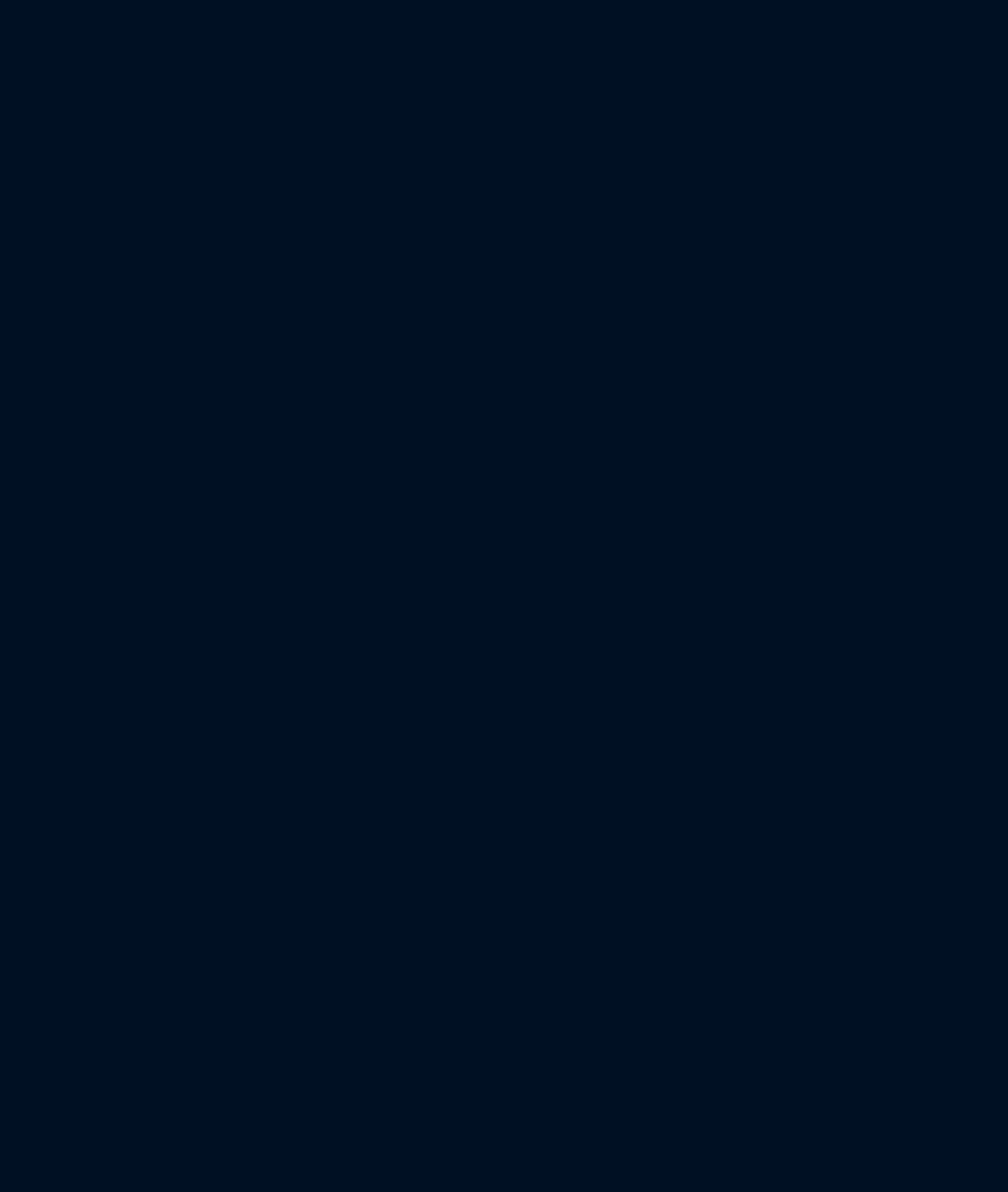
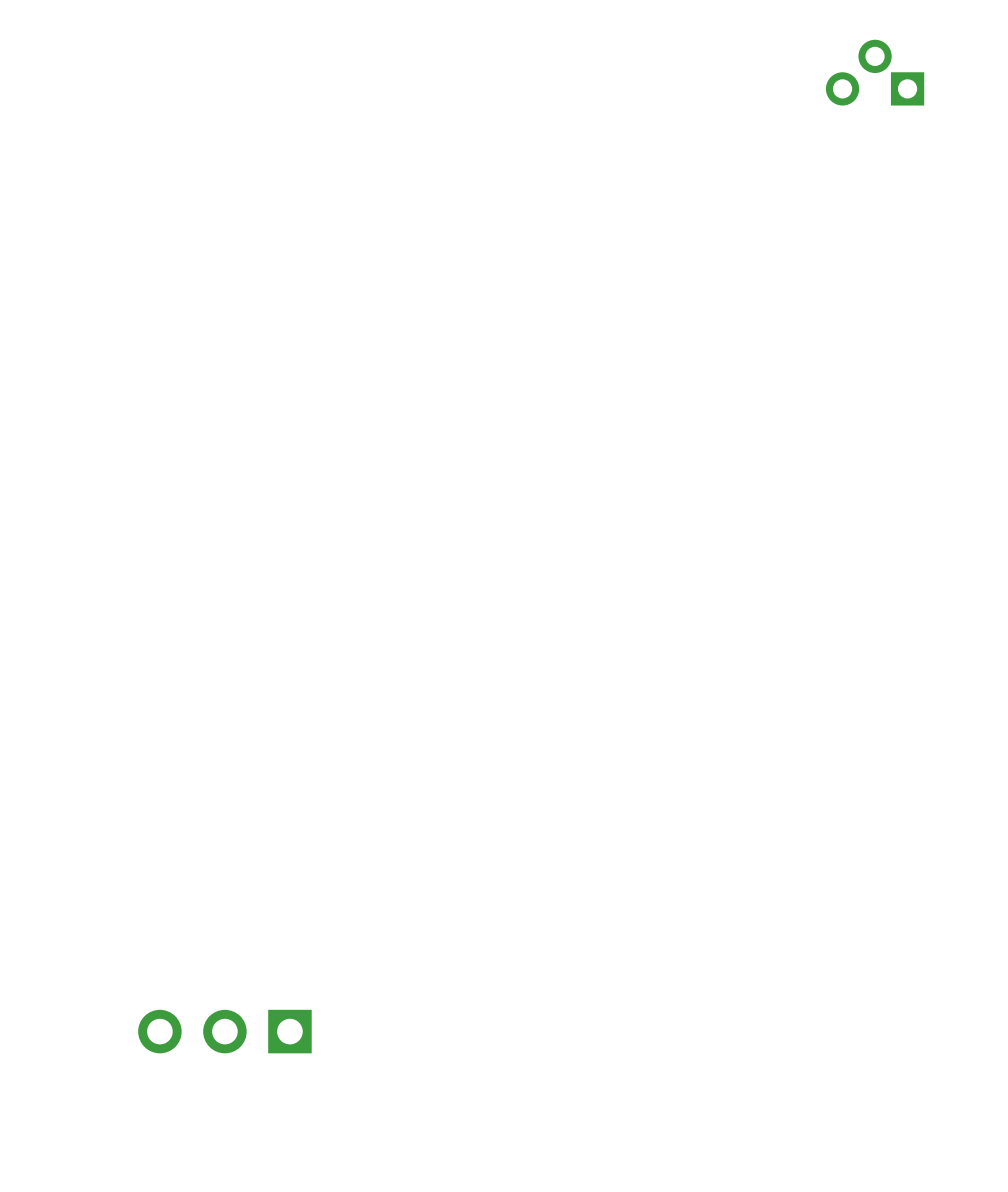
part: none -> (875, 72)
part: none -> (224, 1031)

